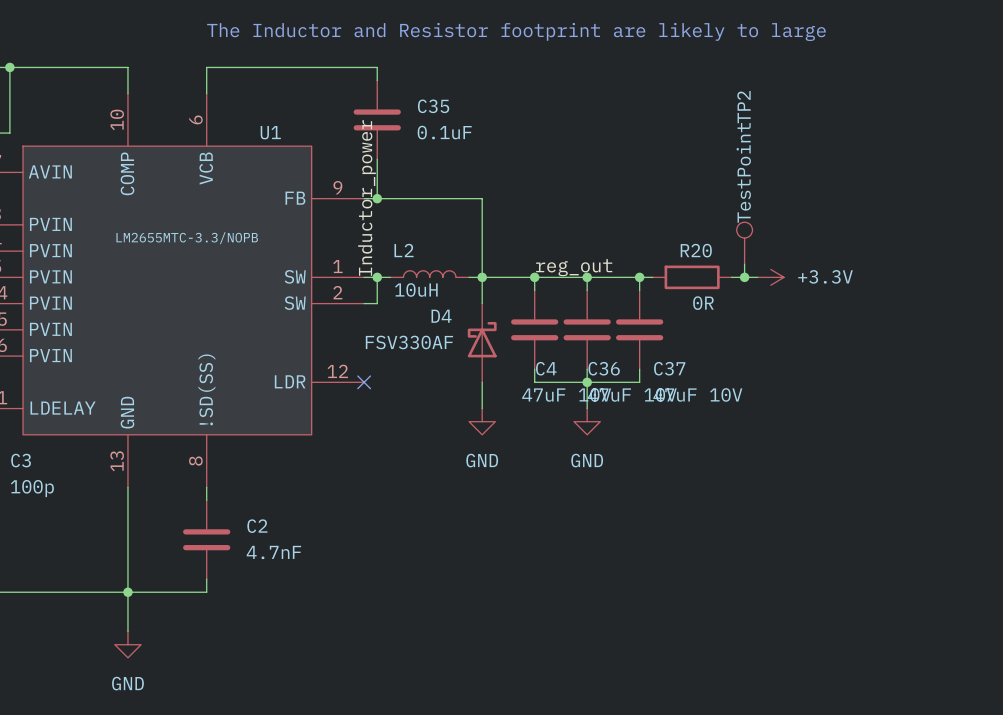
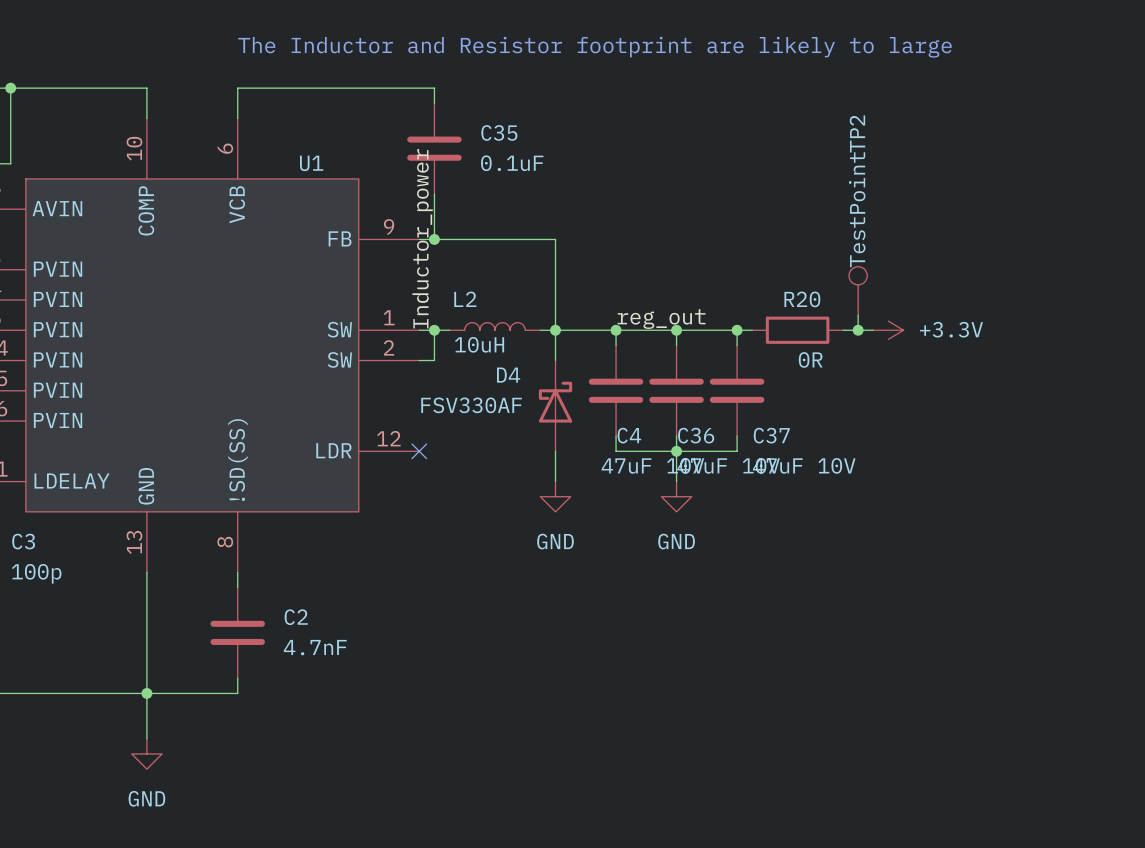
U1 value: LM2655MTC-3.3/NOPB (187, 238) -> none

